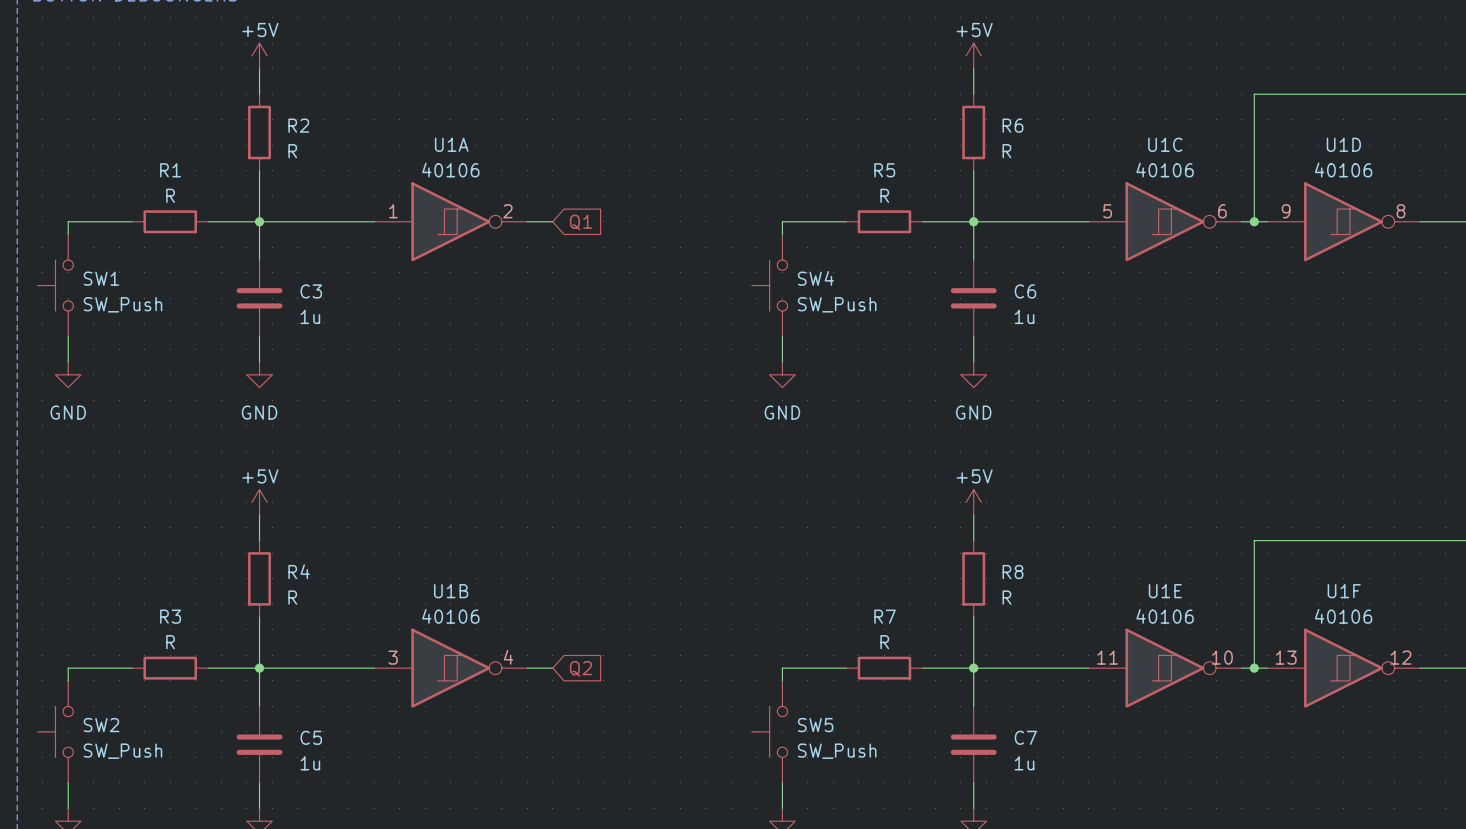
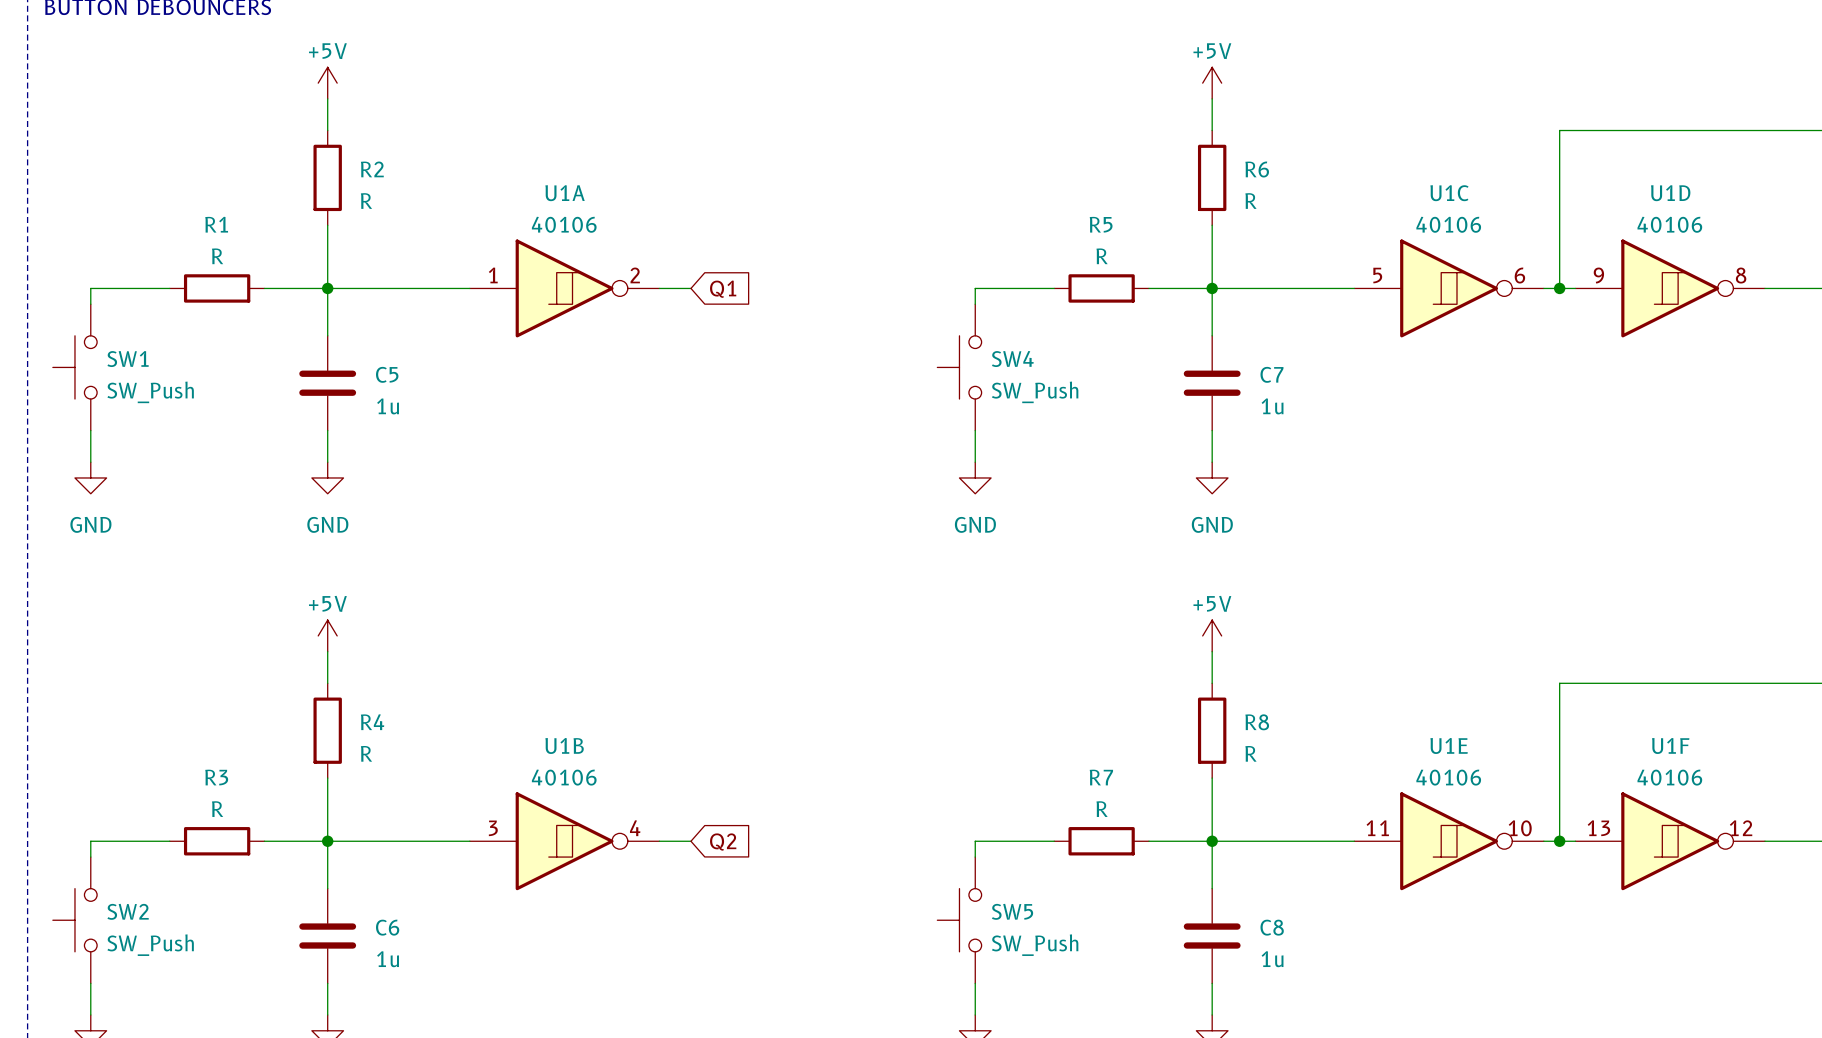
C3 name: C3 (311, 291) -> C5 (387, 374)
C6 name: C6 (1025, 291) -> C7 (1271, 374)
C5 name: C5 (311, 737) -> C6 (387, 927)
C7 name: C7 (1025, 737) -> C8 (1272, 927)

